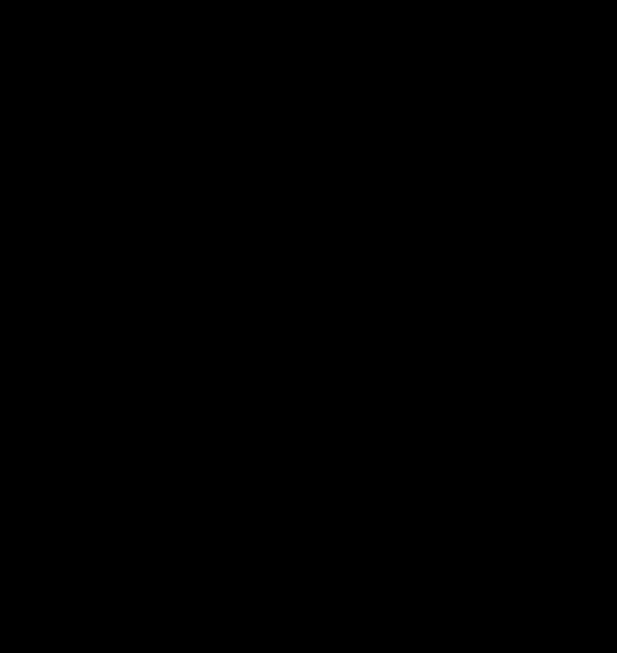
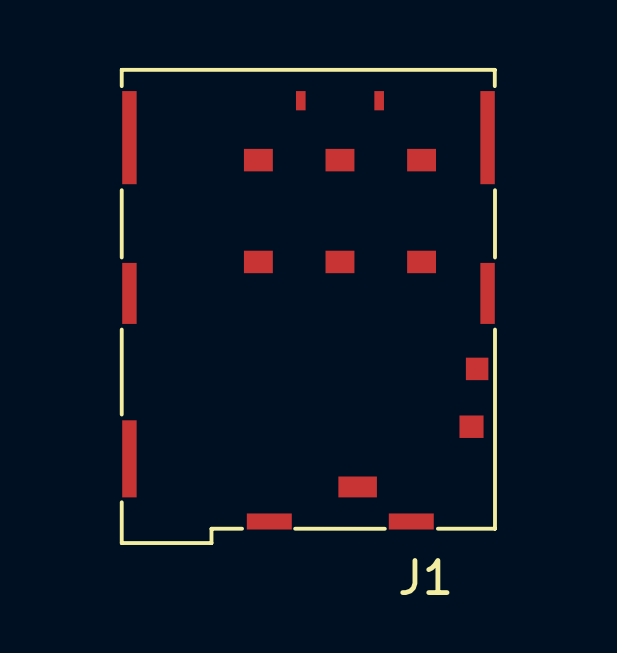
J1: none -> (308, 306)

